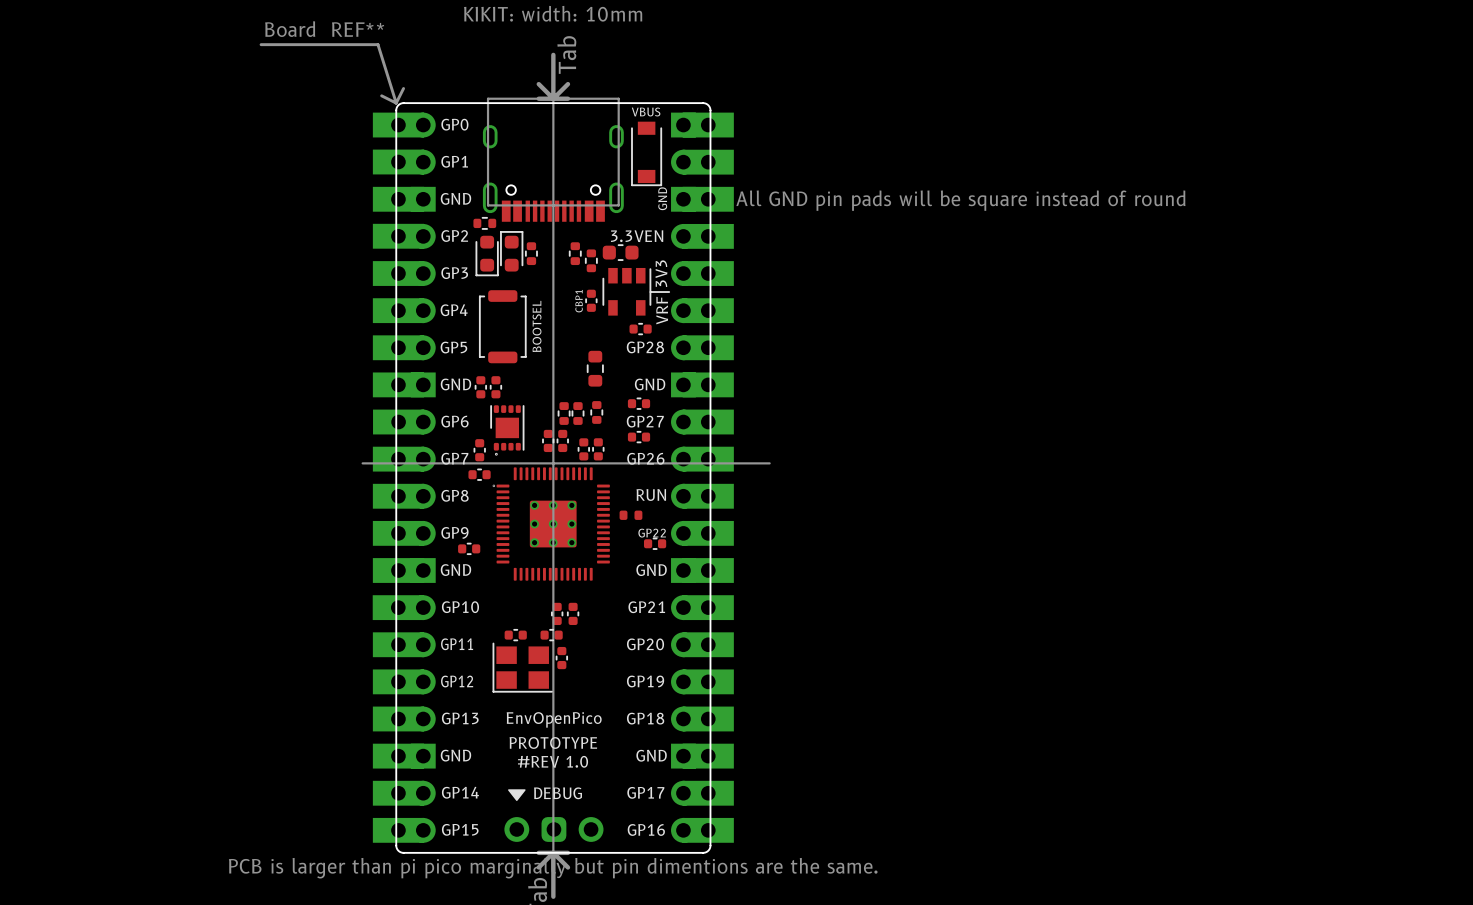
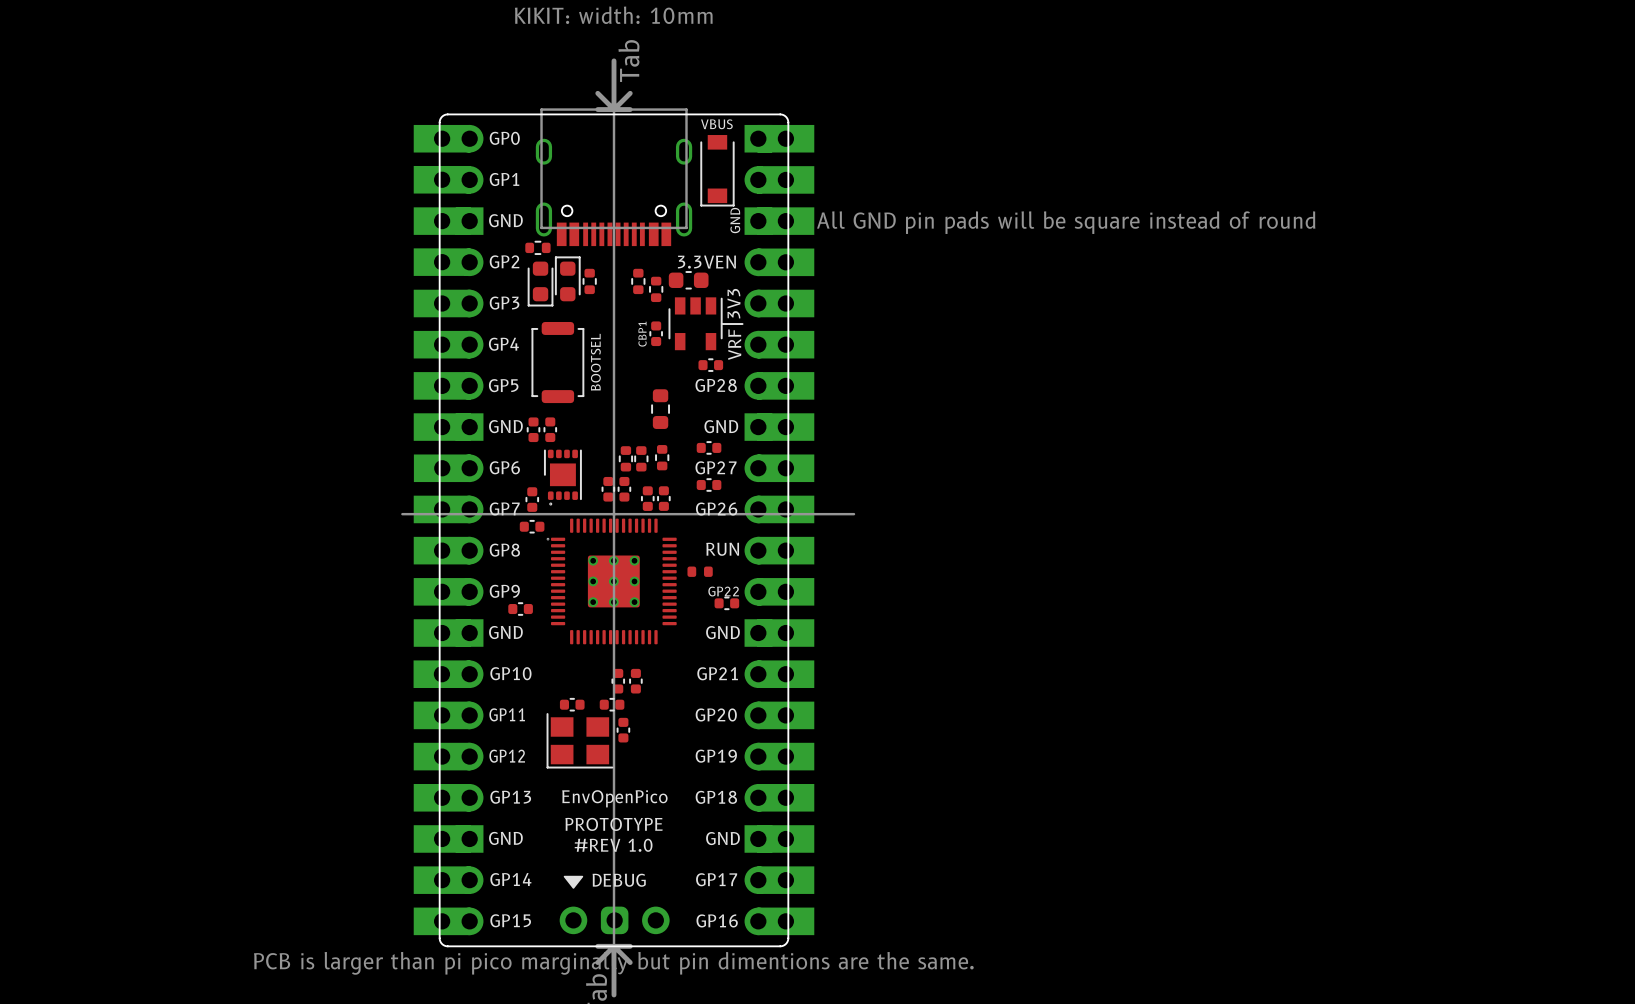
REF**: Board (332, 73) -> none

